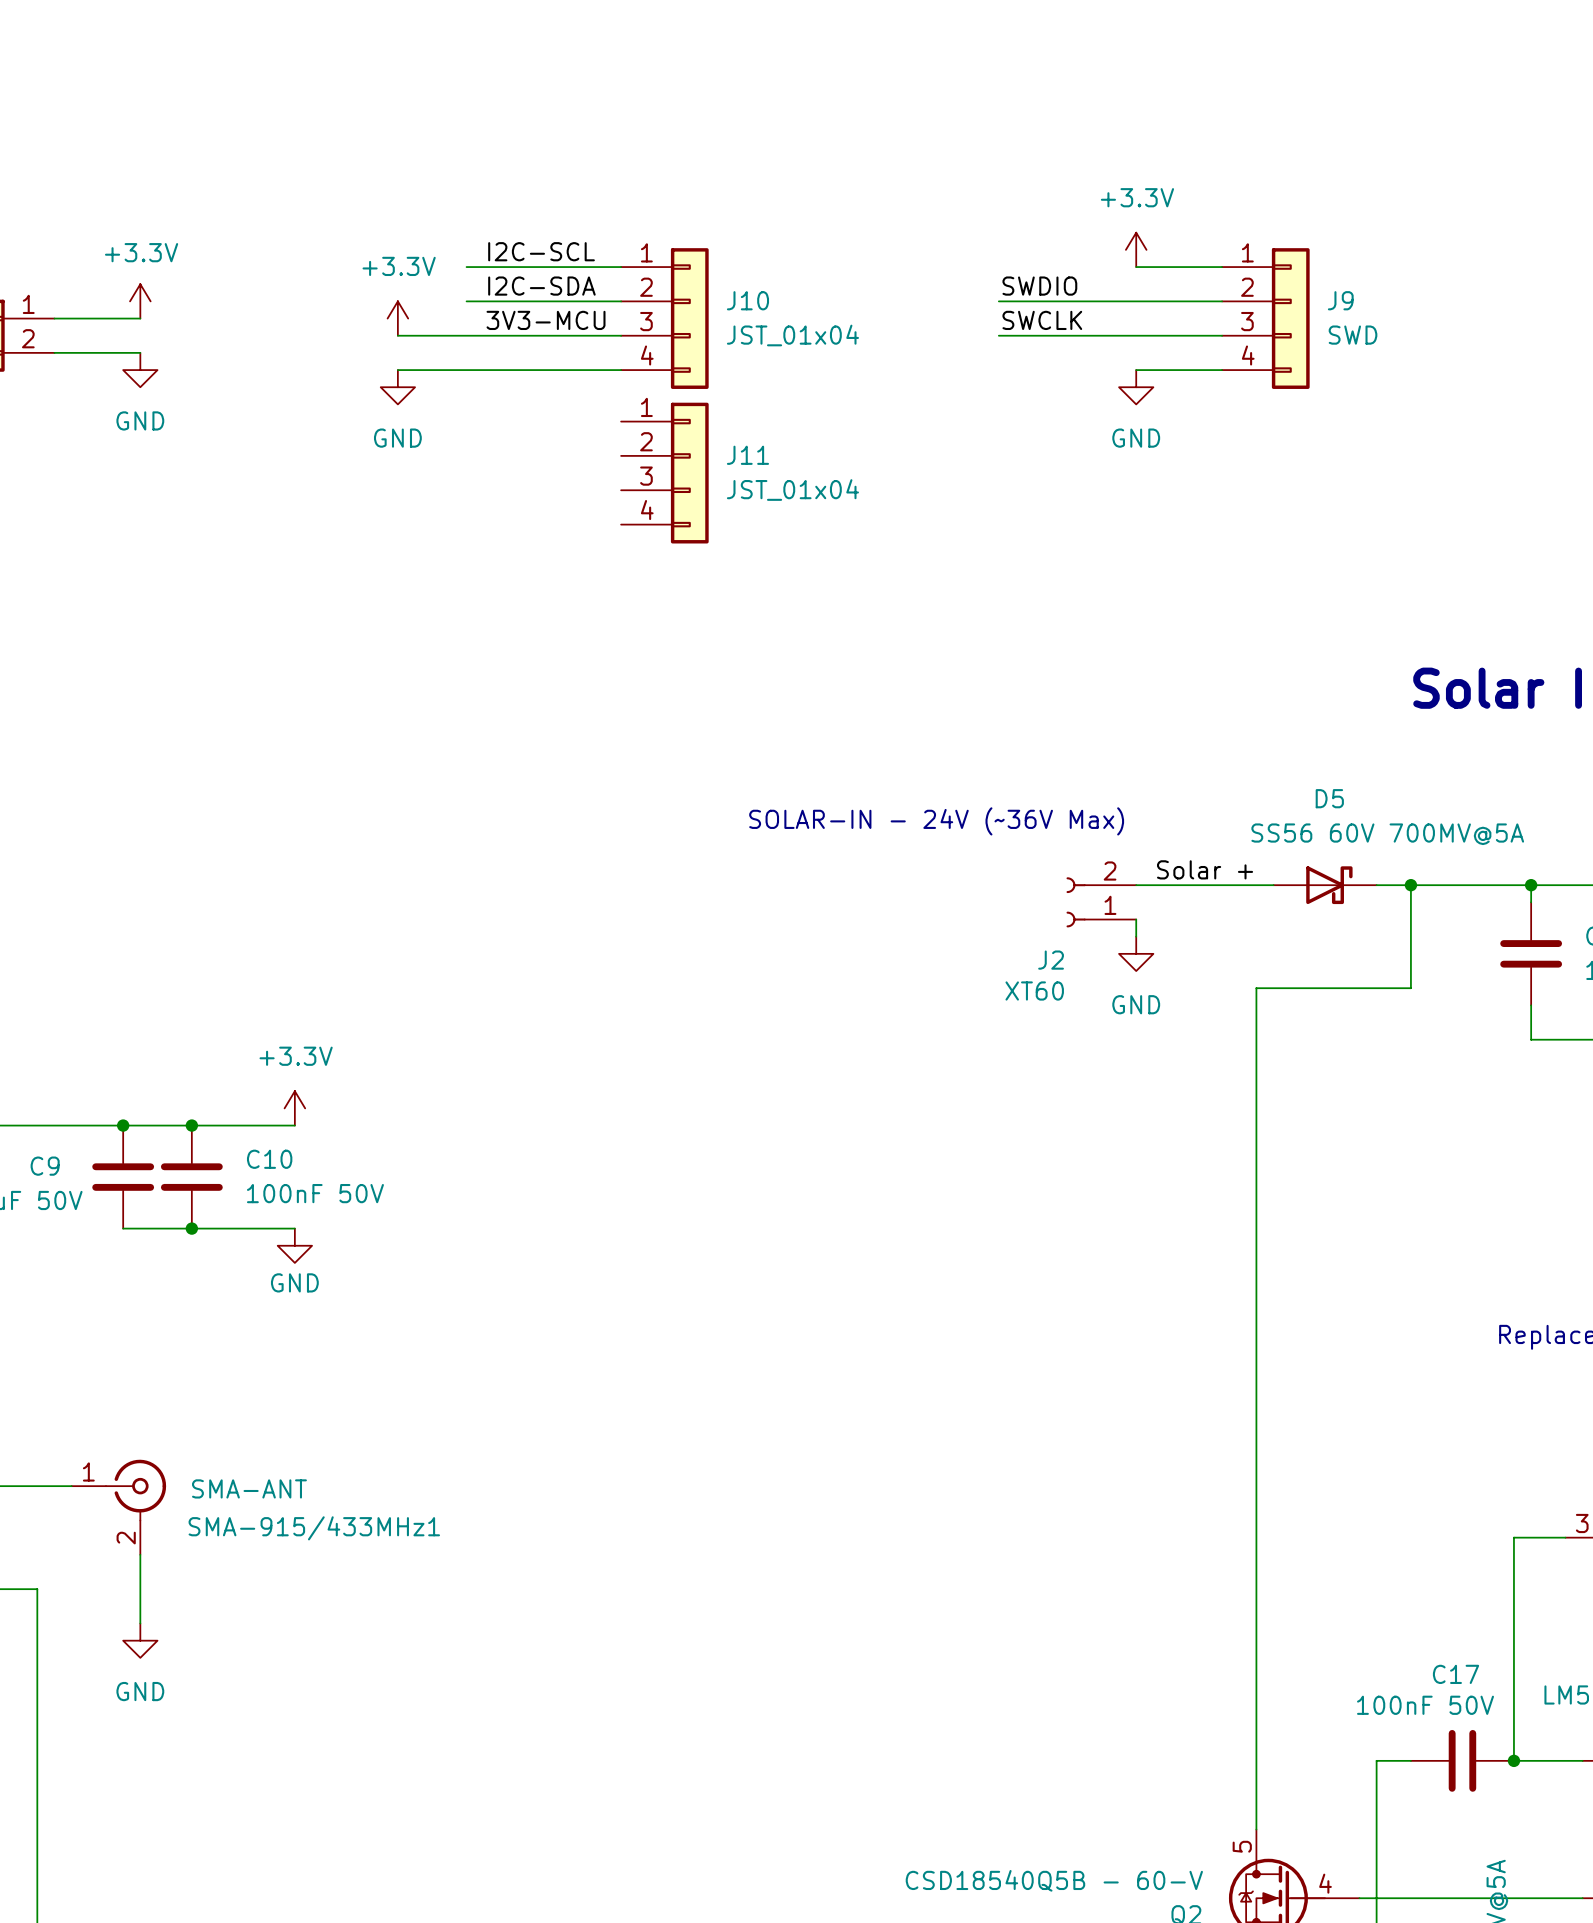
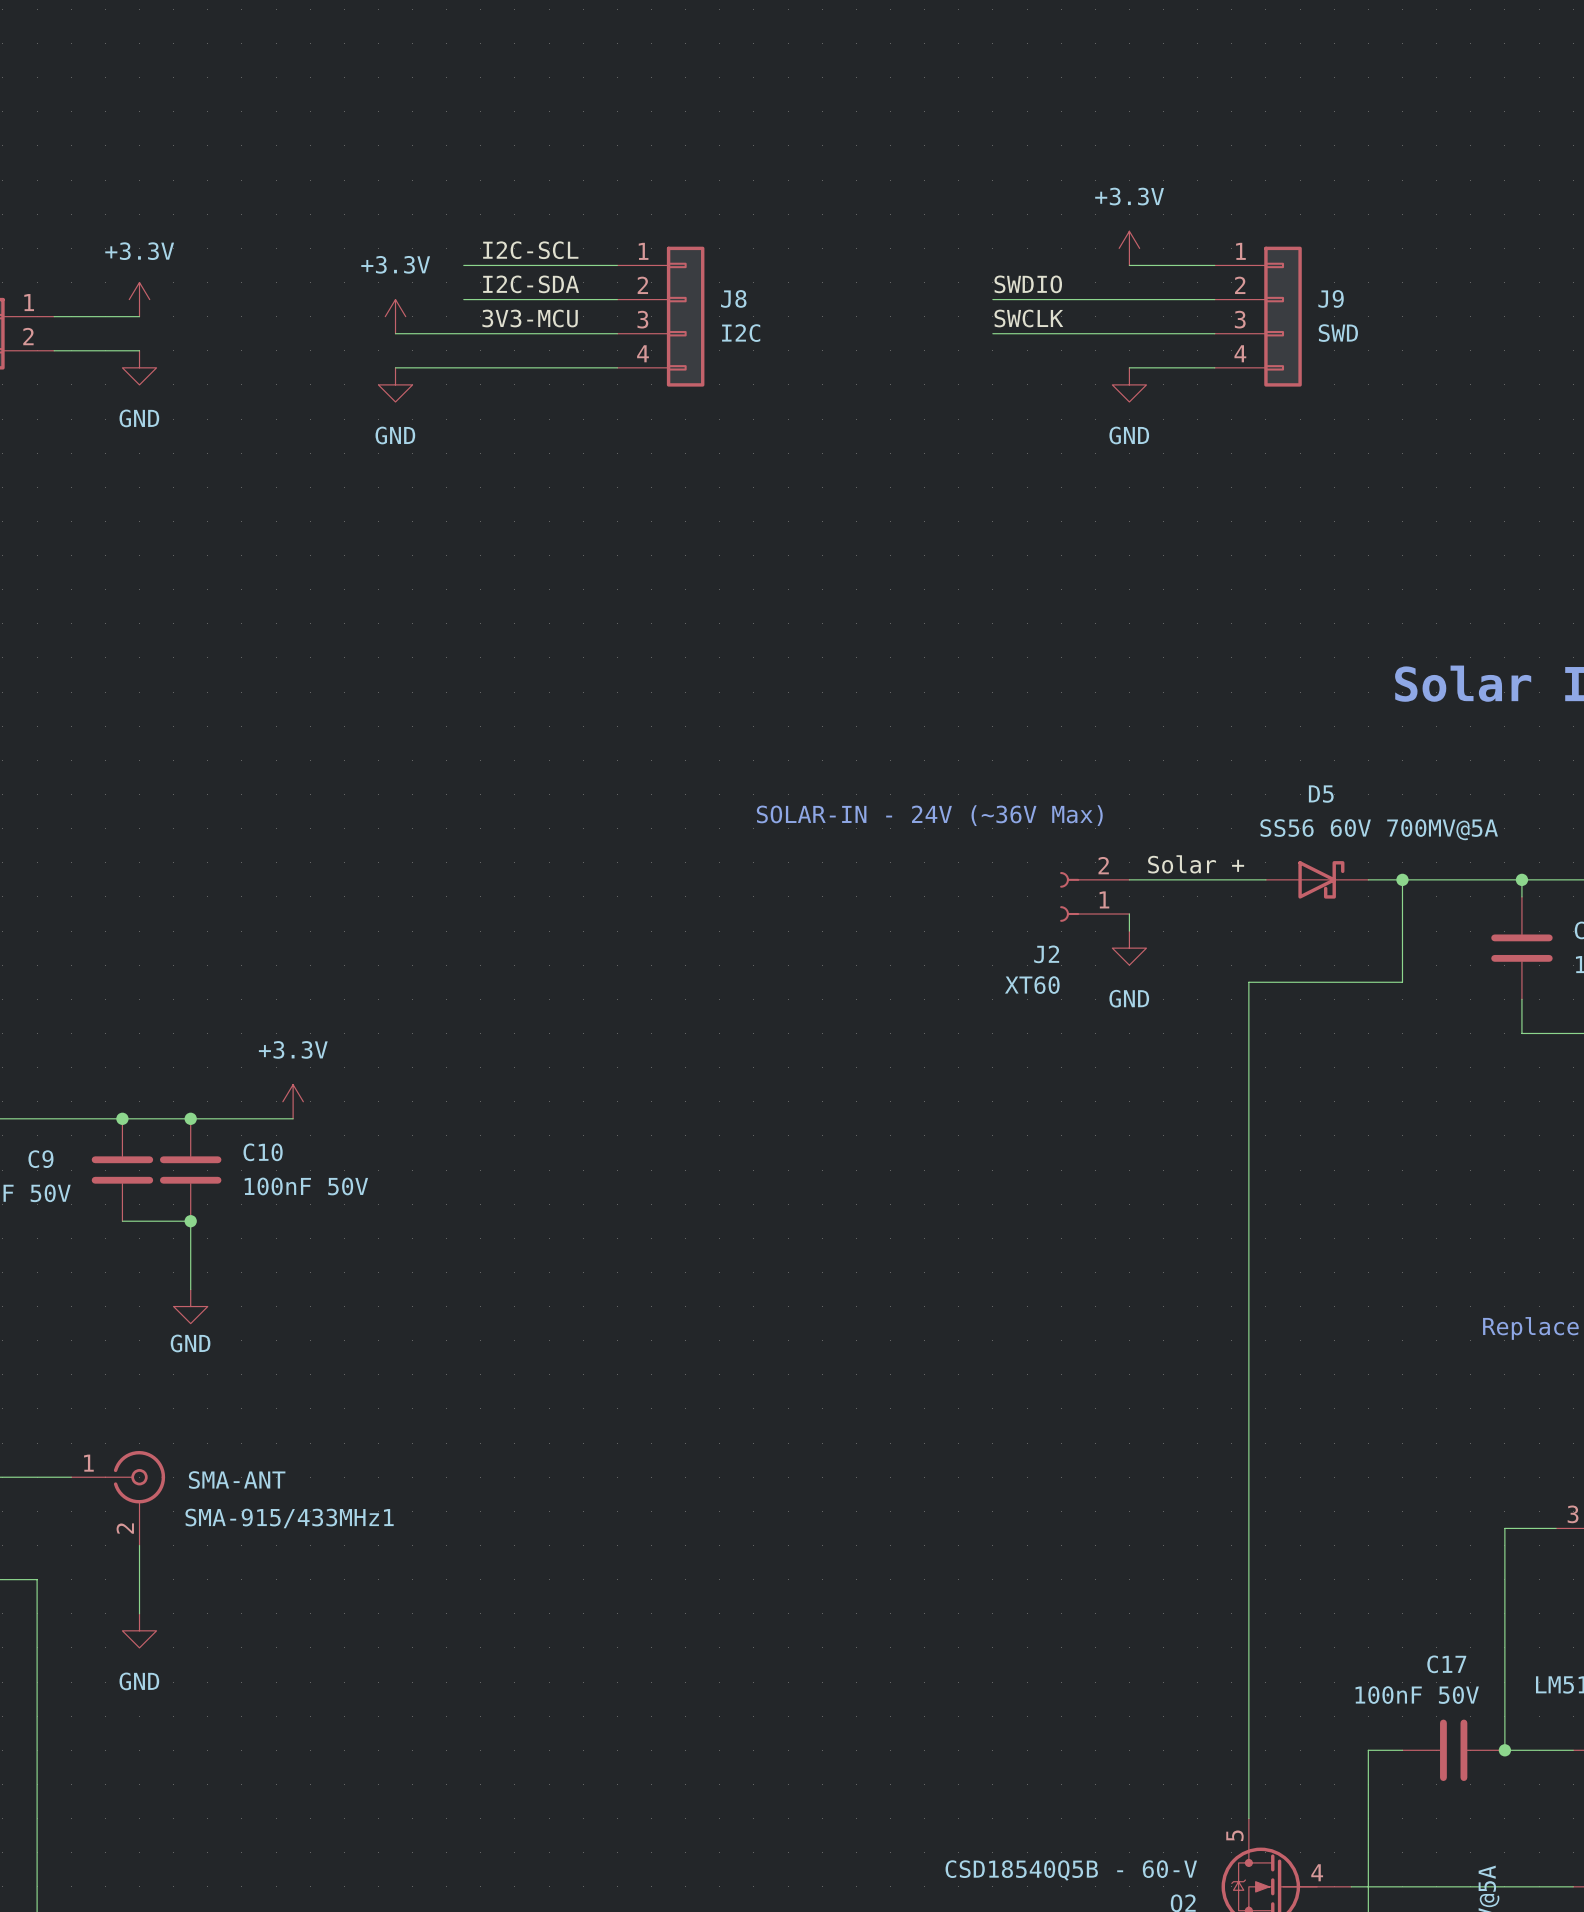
J10 name: J10 (747, 300) -> J8 (733, 298)
J10 value: JST_01x04 (792, 335) -> I2C (741, 333)
J11: JST_01x04 (664, 473) -> none
wire: (191, 1228) (294, 1228) -> (190, 1221) (190, 1289)
power symbol position: GND (294, 1245) -> GND (190, 1306)

